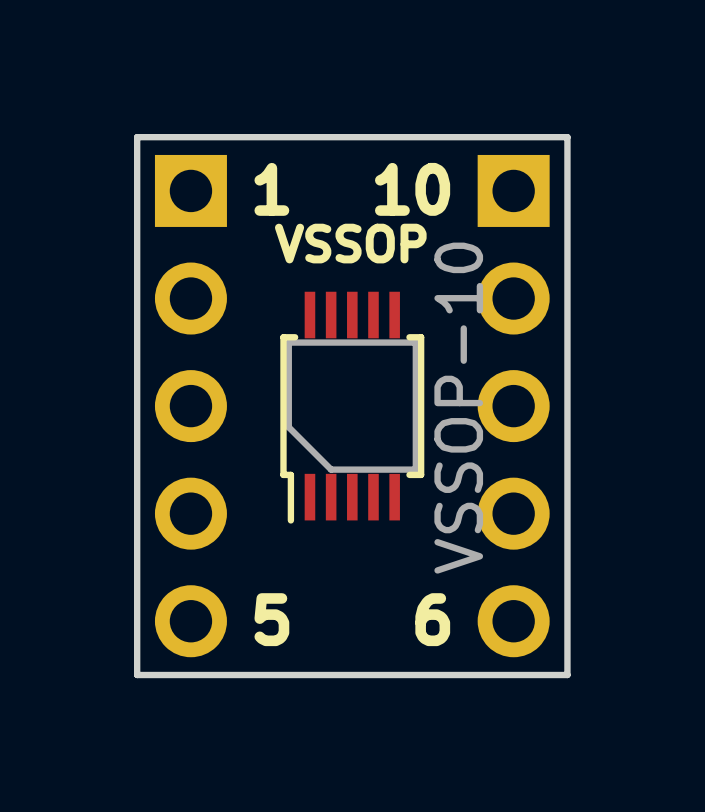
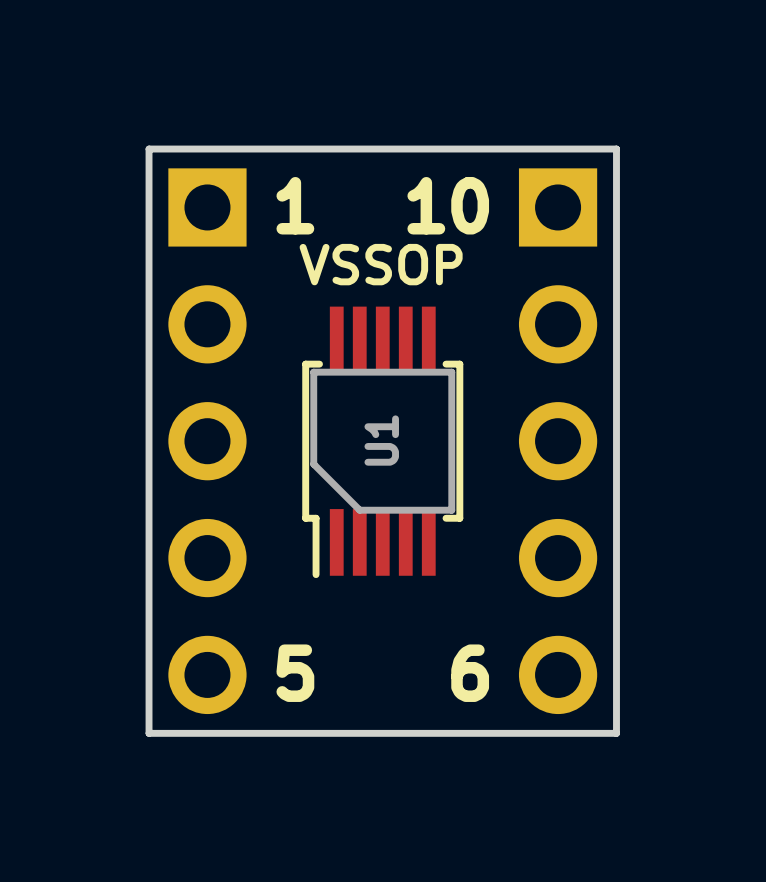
VSSOP: VSSOP-10 (352, 407) -> none
U1: none -> VSSOP (382, 442)

